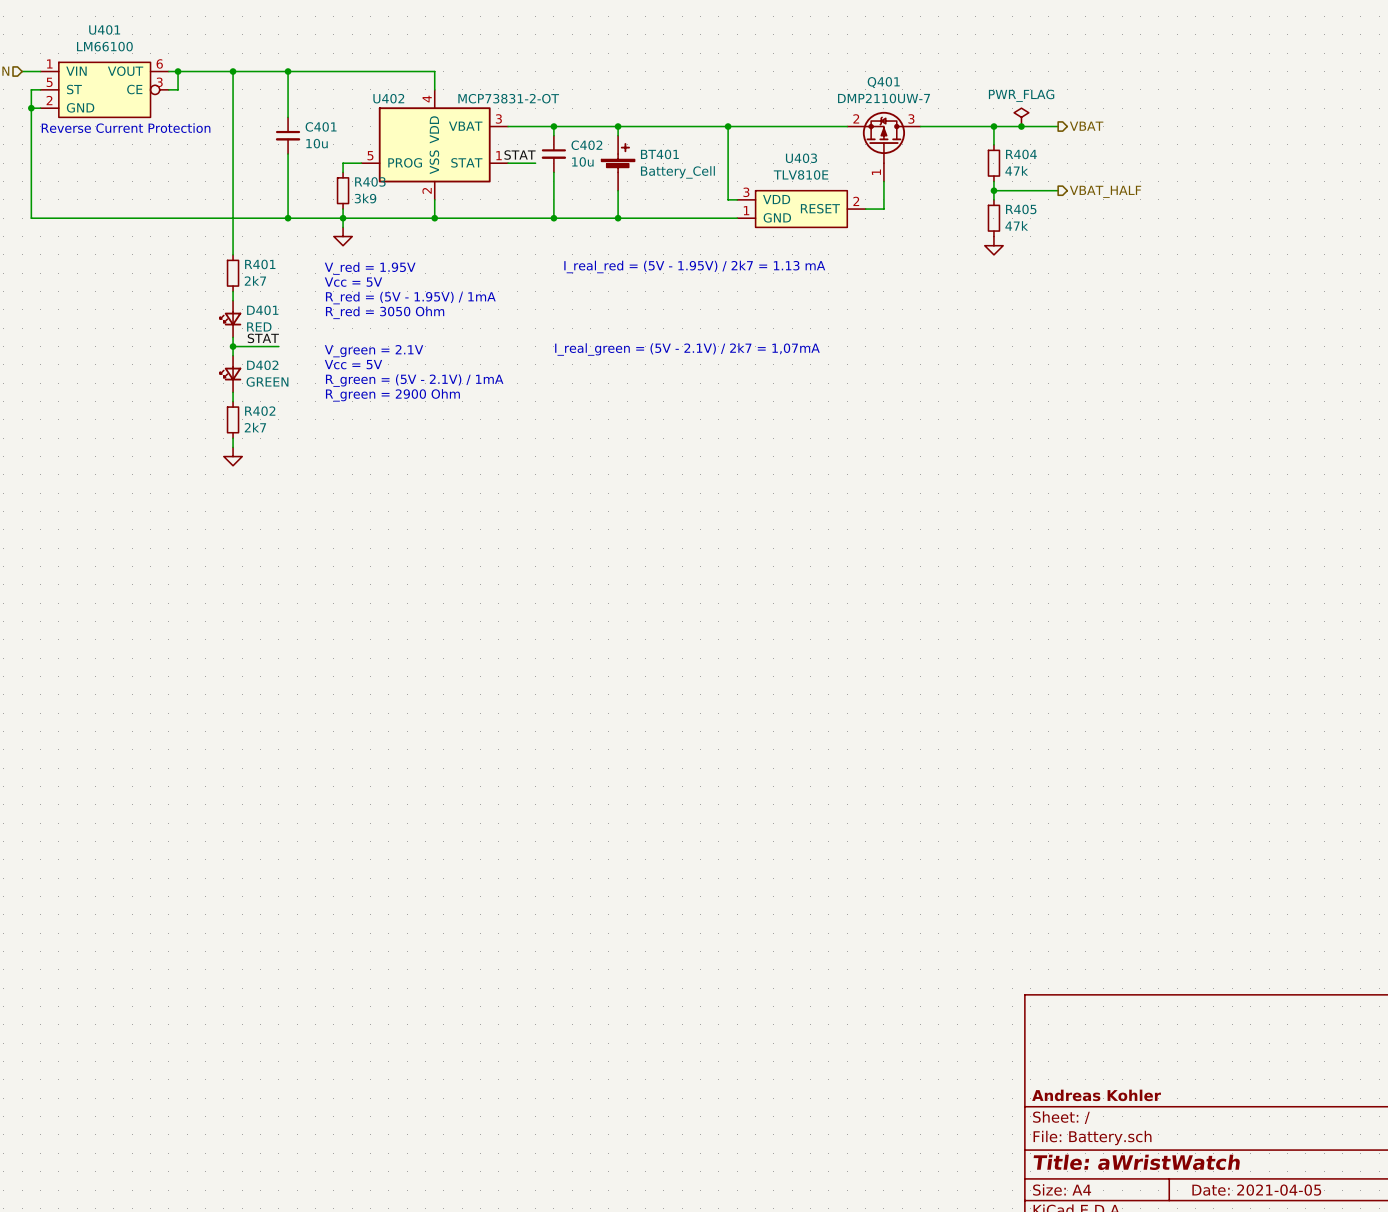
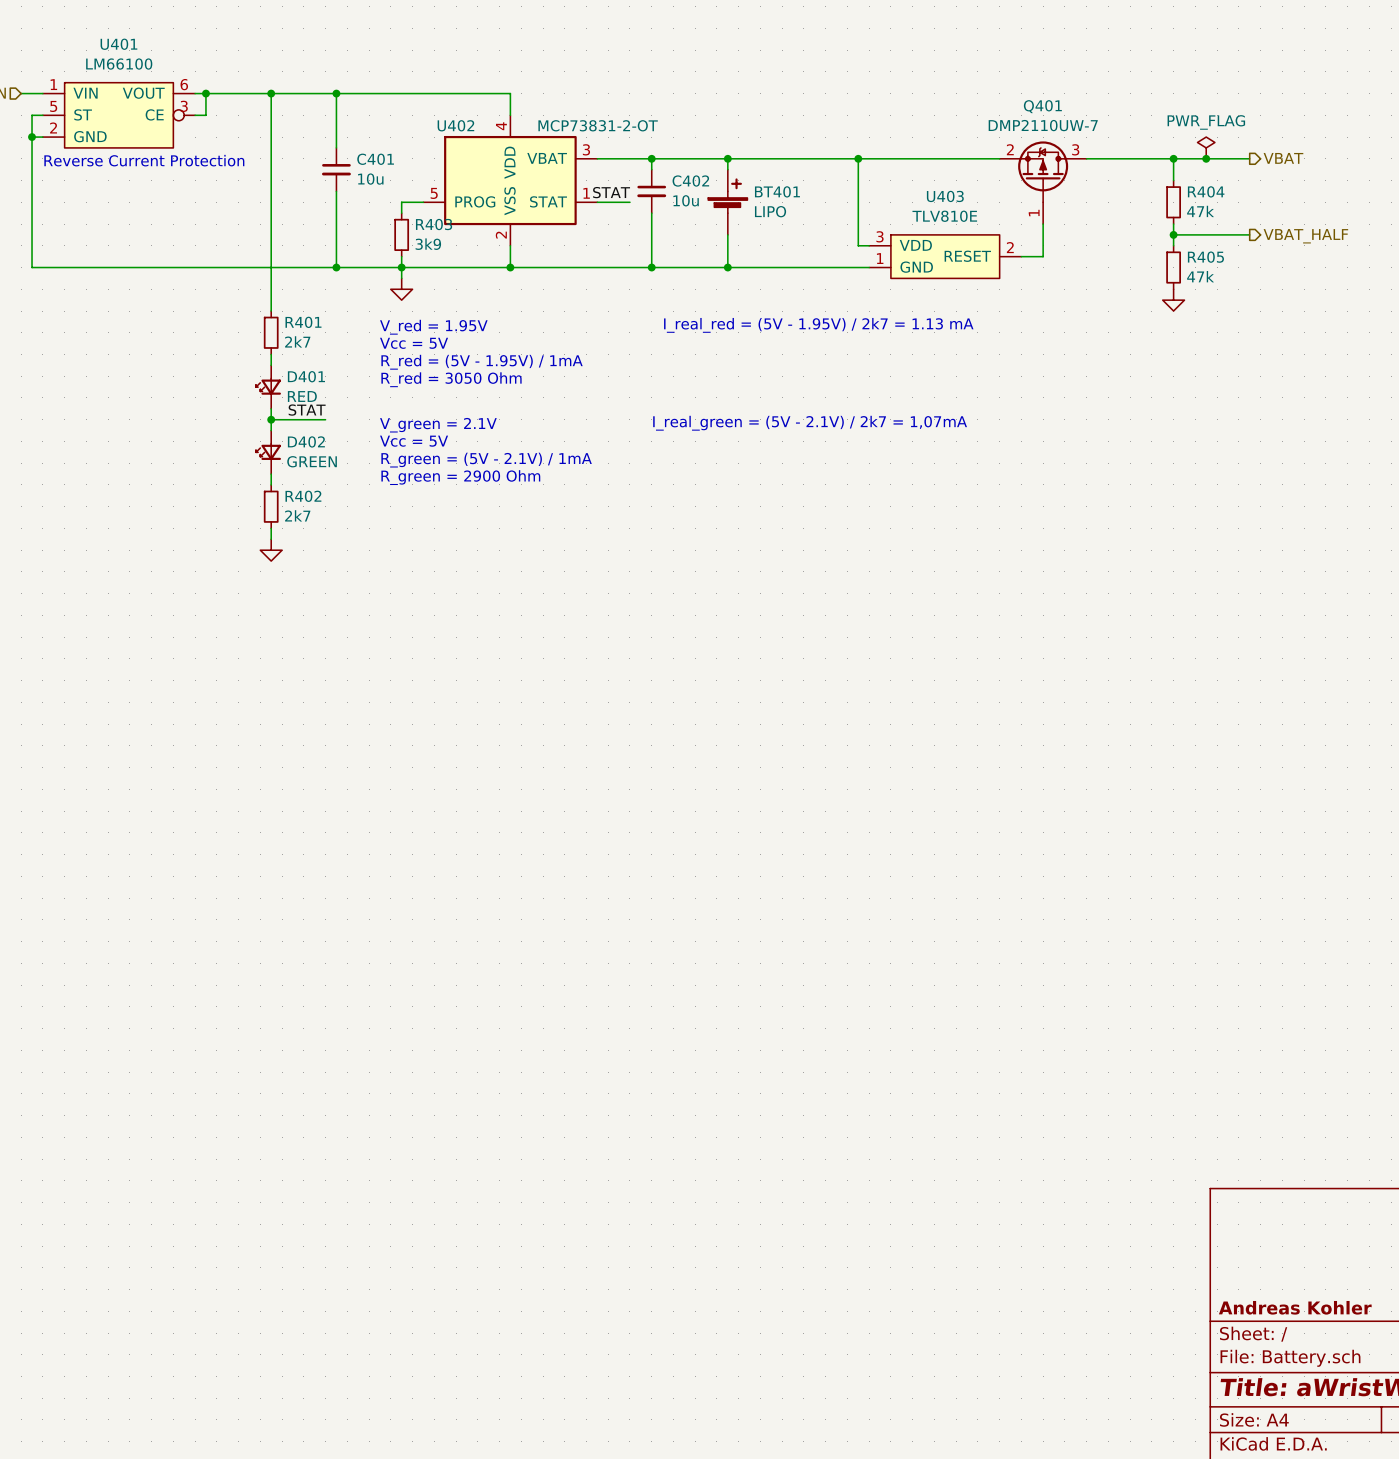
BT401 value: Battery_Cell (677, 172) -> LIPO (770, 211)

